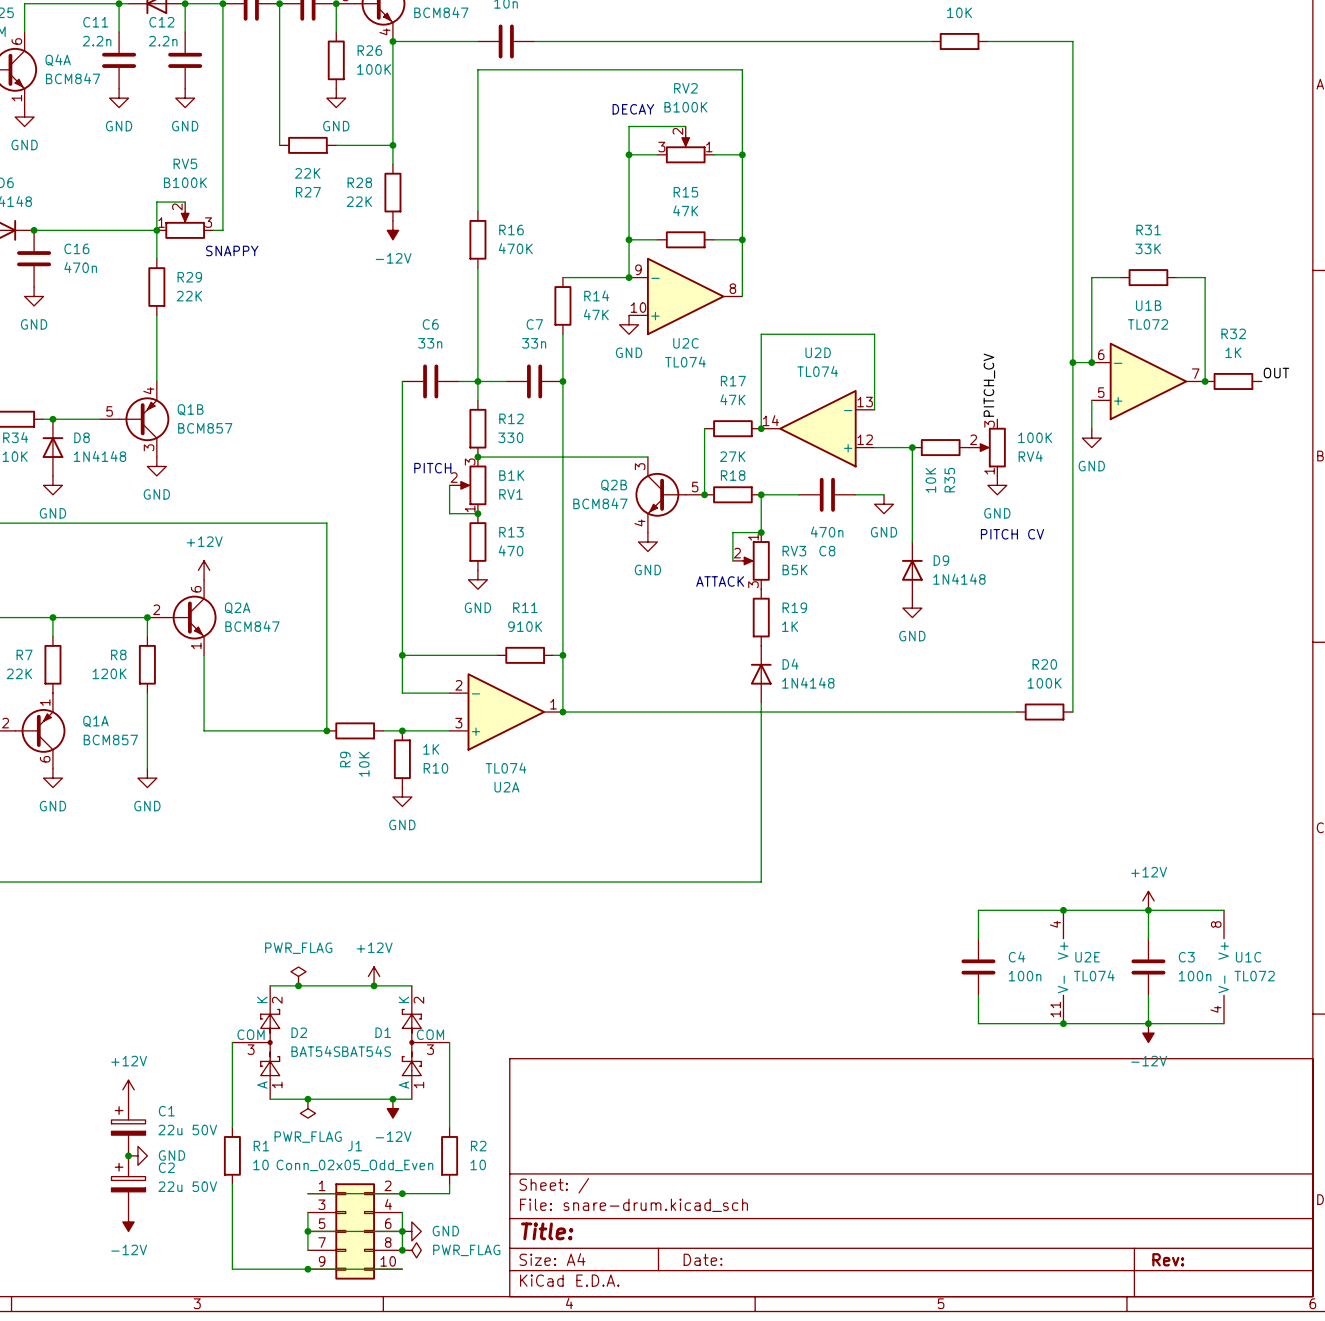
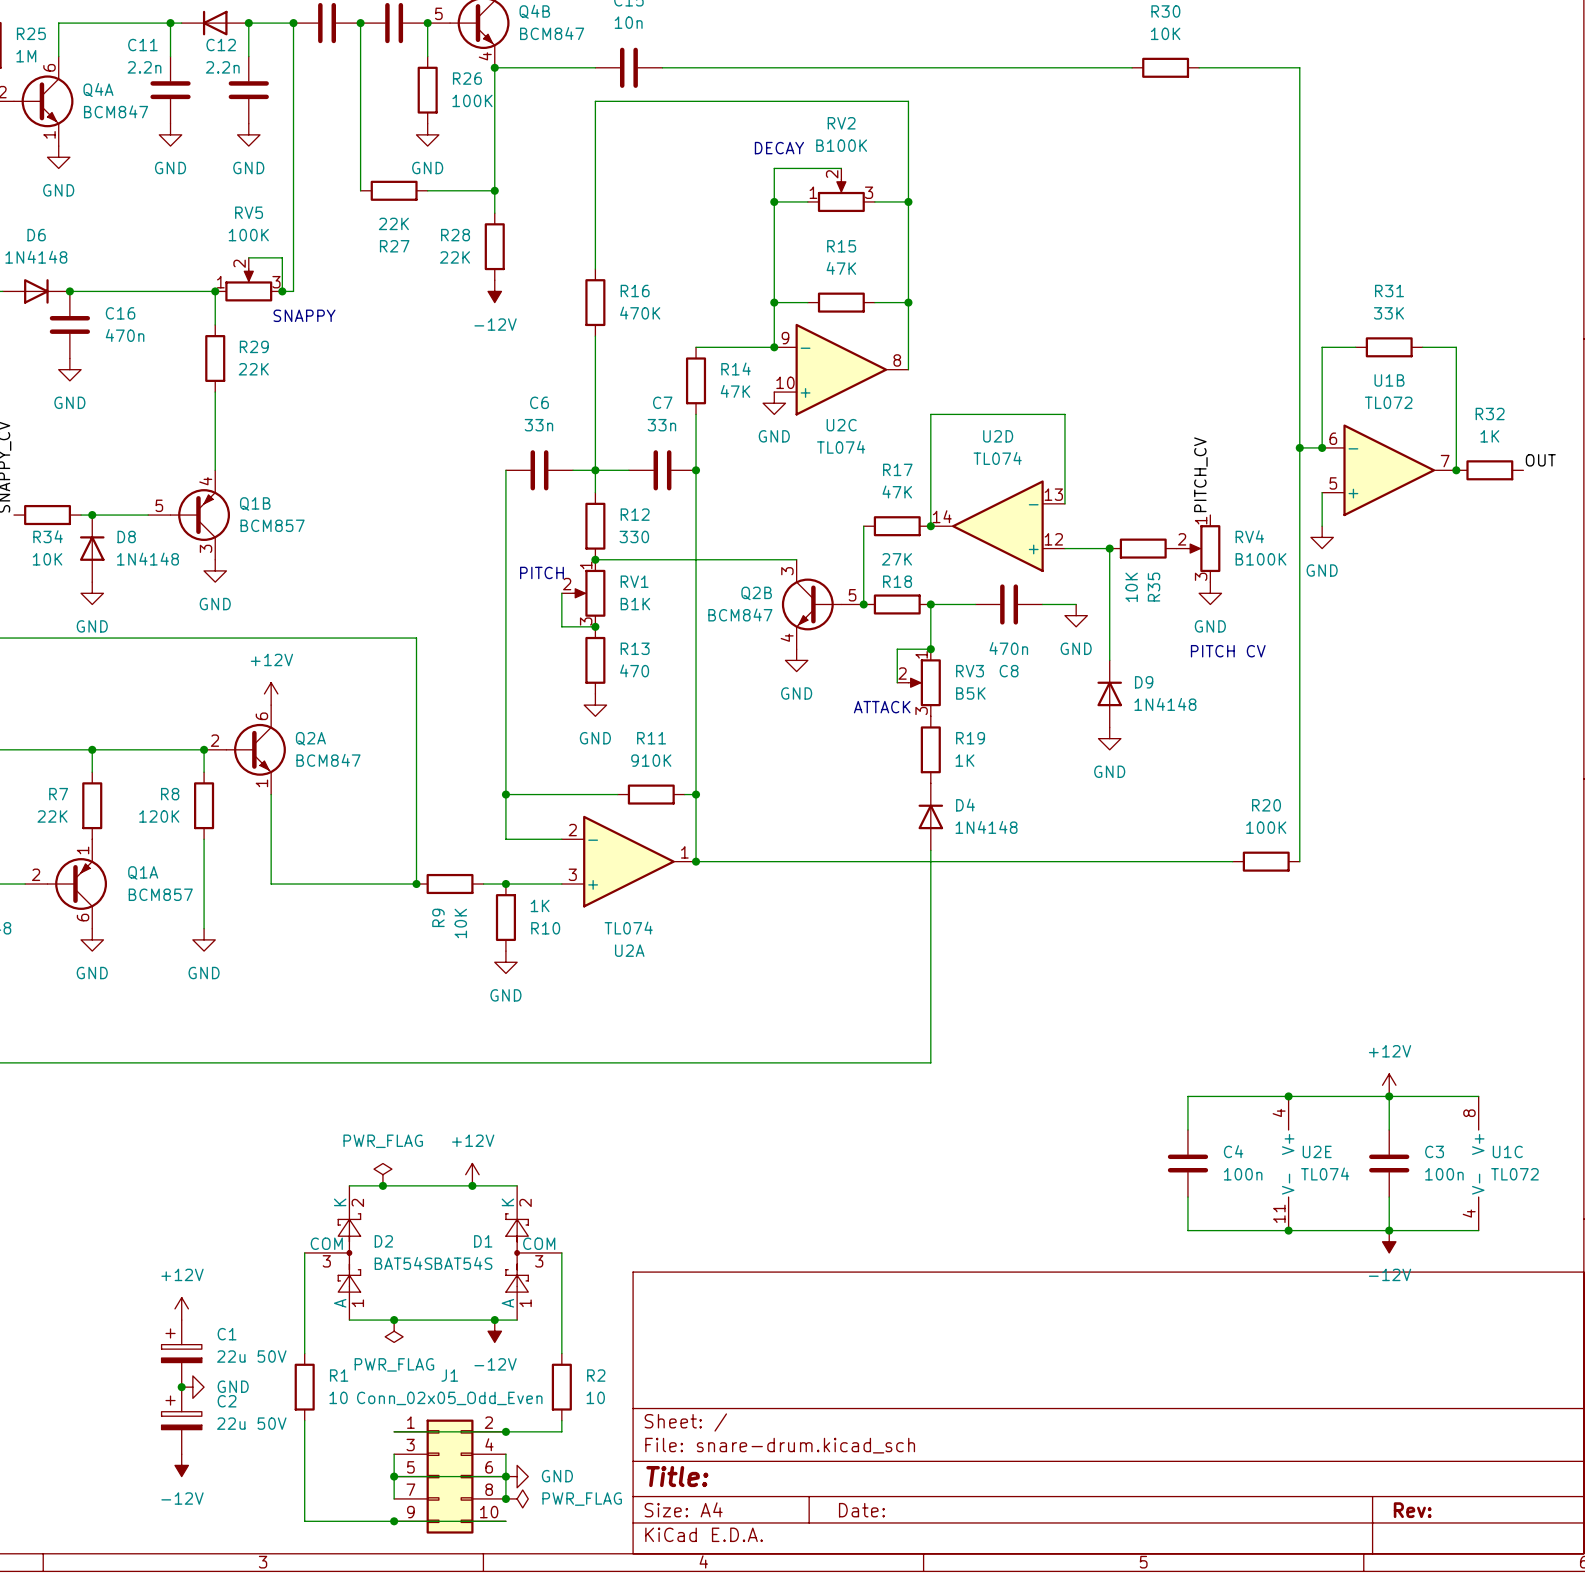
RV2 flip: as is (685, 149) -> left-right (841, 195)
RV5 value: B100K (185, 182) -> 100K (248, 235)
wire: (185, 202) (156, 202) (156, 230) -> (248, 257) (282, 257) (282, 291)
junction: none -> (282, 291)
RV4 value: 100K (1035, 437) -> B100K (1261, 559)
RV4 flip: as is (992, 447) -> up-down (1204, 548)
RV1 flip: as is (472, 485) -> up-down (589, 593)

